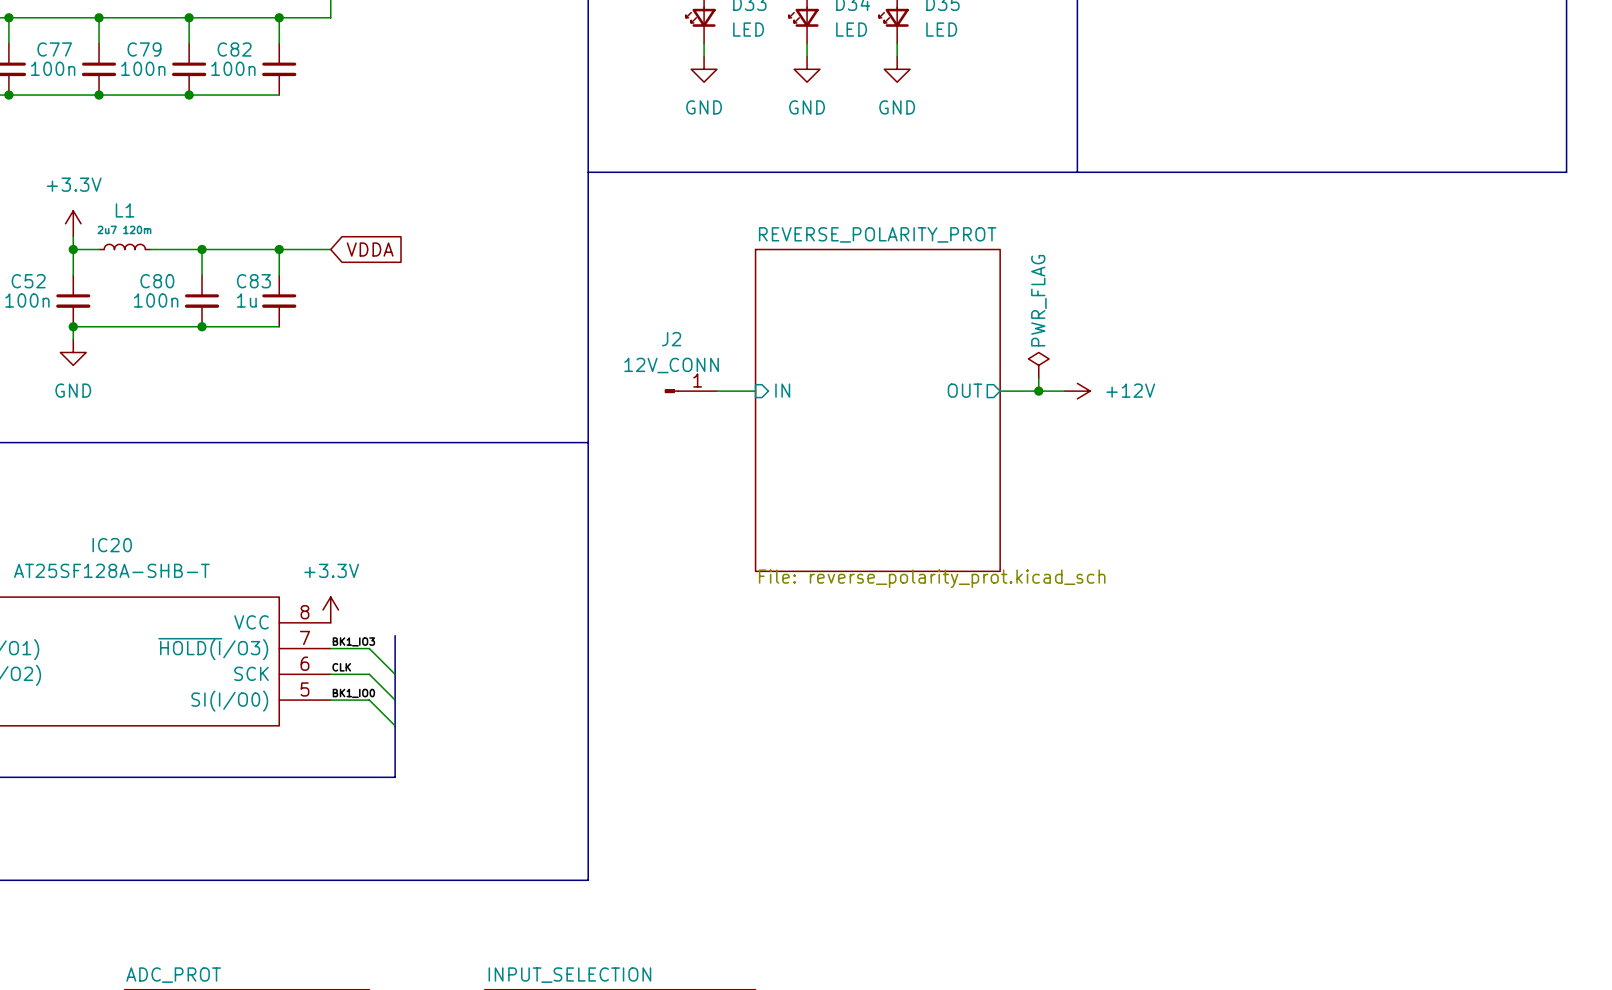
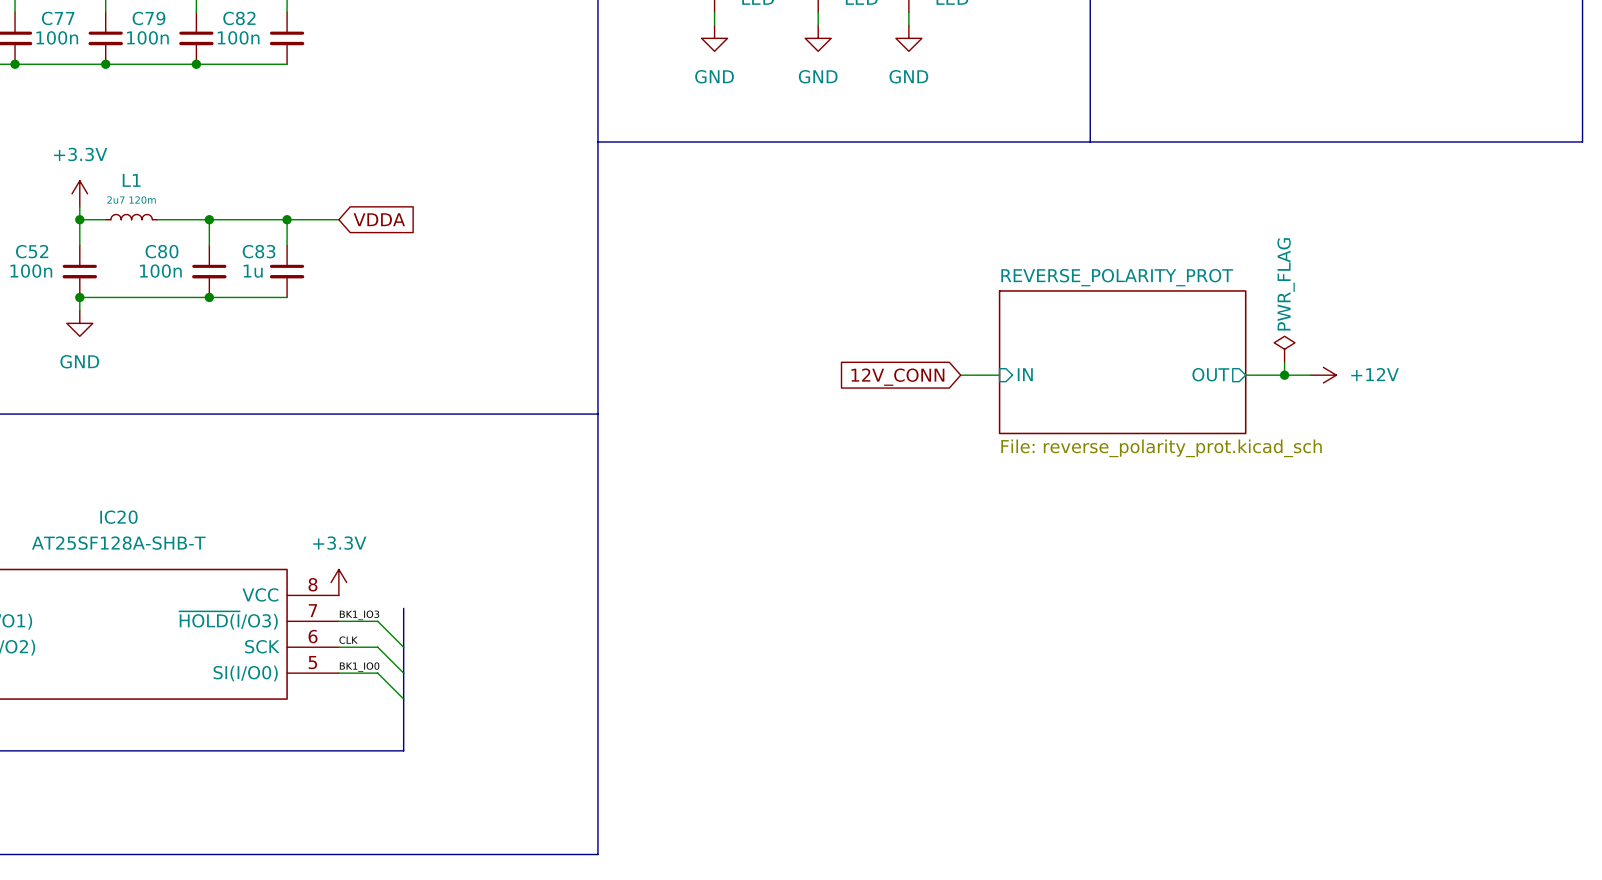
power symbol position: PWR_FLAG (1038, 365) -> PWR_FLAG (1284, 349)
wire: (1038, 378) (1038, 391) -> (1284, 362) (1284, 375)
sheet pin position: IN (782, 390) -> IN (1025, 374)
sheet pin position: OUT (965, 390) -> OUT (1210, 374)
J2: 12V_CONN (690, 391) -> none
wire: (716, 391) (755, 391) -> (960, 375) (999, 375)
wire: (1000, 391) (1064, 391) -> (1245, 375) (1310, 375)
junction: (1038, 391) -> none
power symbol position: +12V (1077, 391) -> +12V (1323, 375)
sheet REVERSE_POLARITY_PROT: none -> File: reverse_polarity_prot.kicad_sch (1122, 362)
junction: none -> (1284, 375)
global label: none -> 12V_CONN (897, 377)
sheet REVERSE_POLARITY_PROT: File: reverse_polarity_prot.kicad_sch (877, 410) -> none

